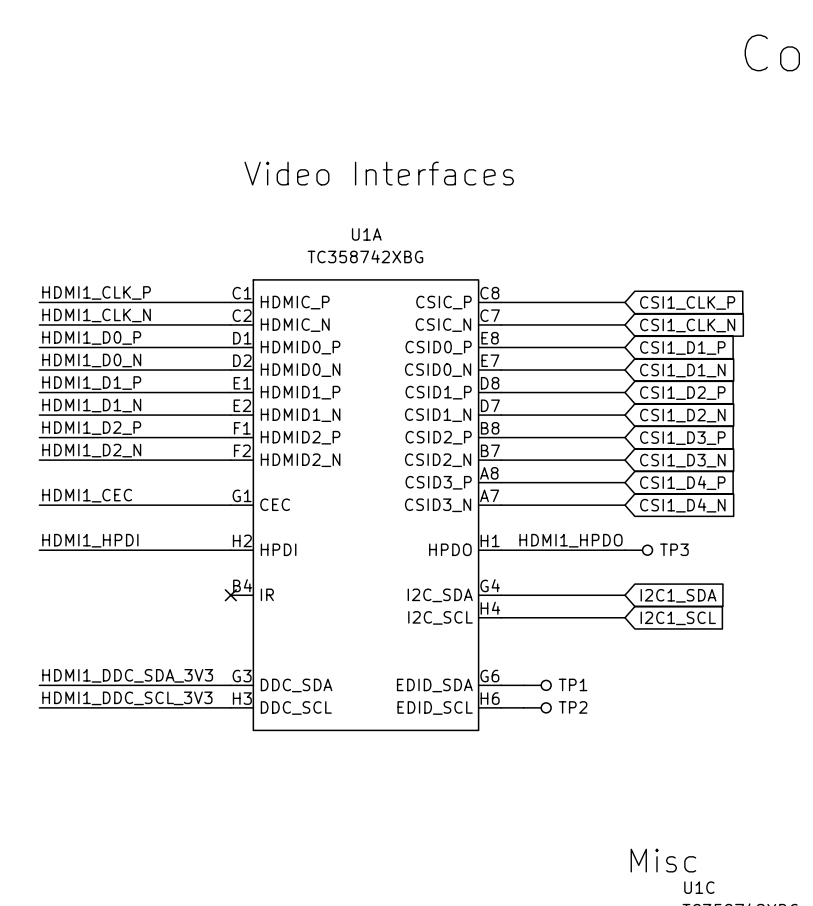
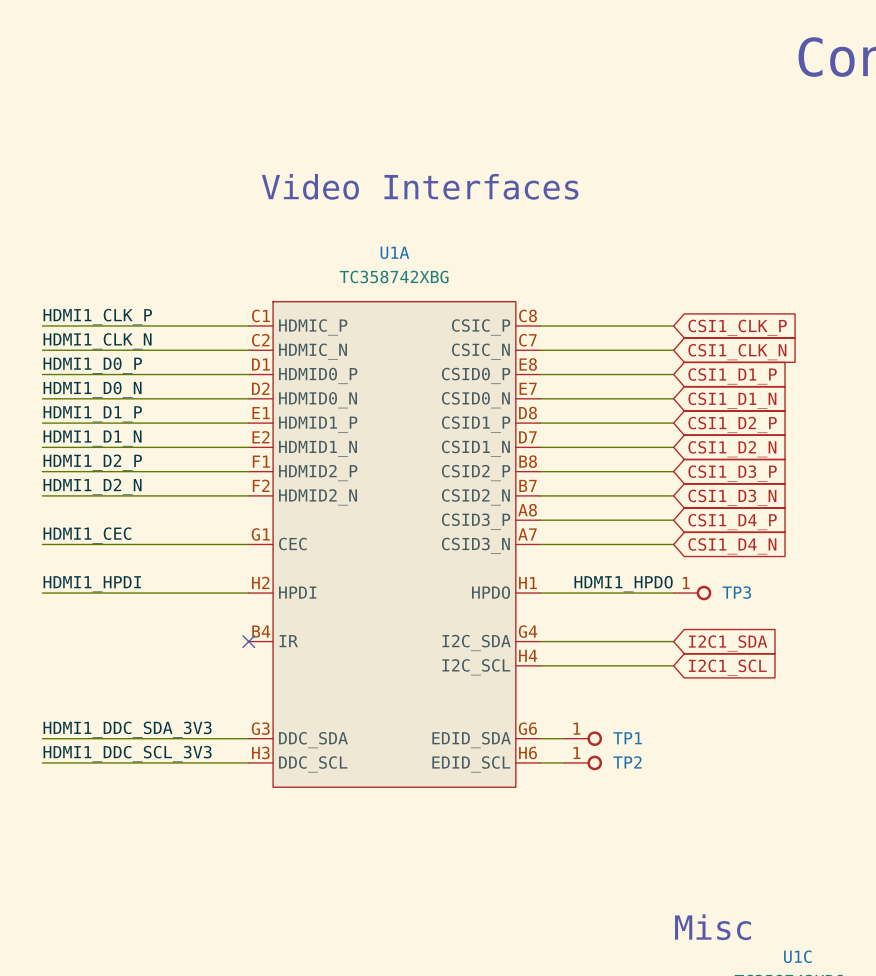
TP3 symbol: [625, 545, 653, 556] -> [673, 585, 712, 601]
TP1 symbol: [523, 680, 552, 691] -> [564, 731, 603, 746]
TP2 symbol: [523, 702, 552, 713] -> [564, 755, 603, 771]
U1C name position: U1C (699, 887) -> U1C (797, 956)

